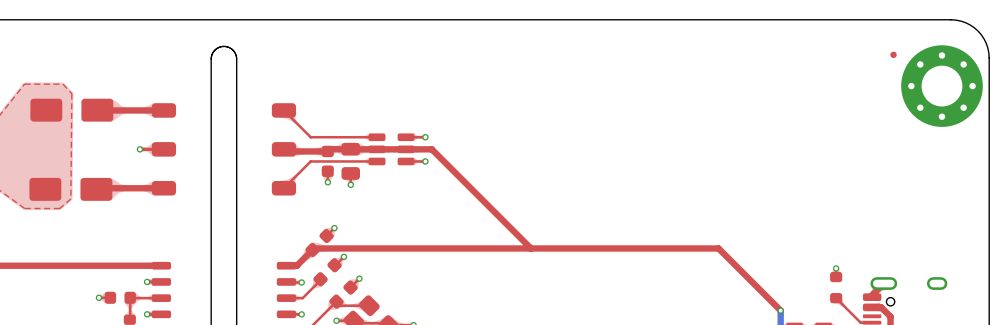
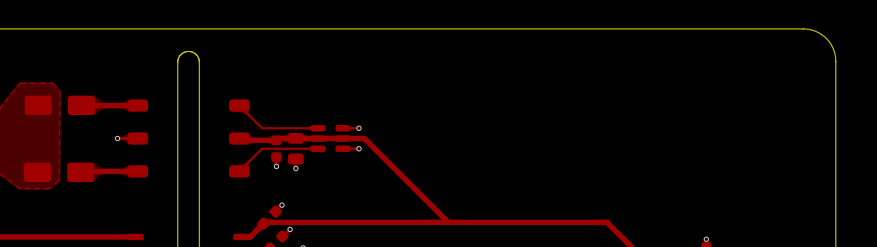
part: (893, 54) -> none
part: (941, 86) -> none

